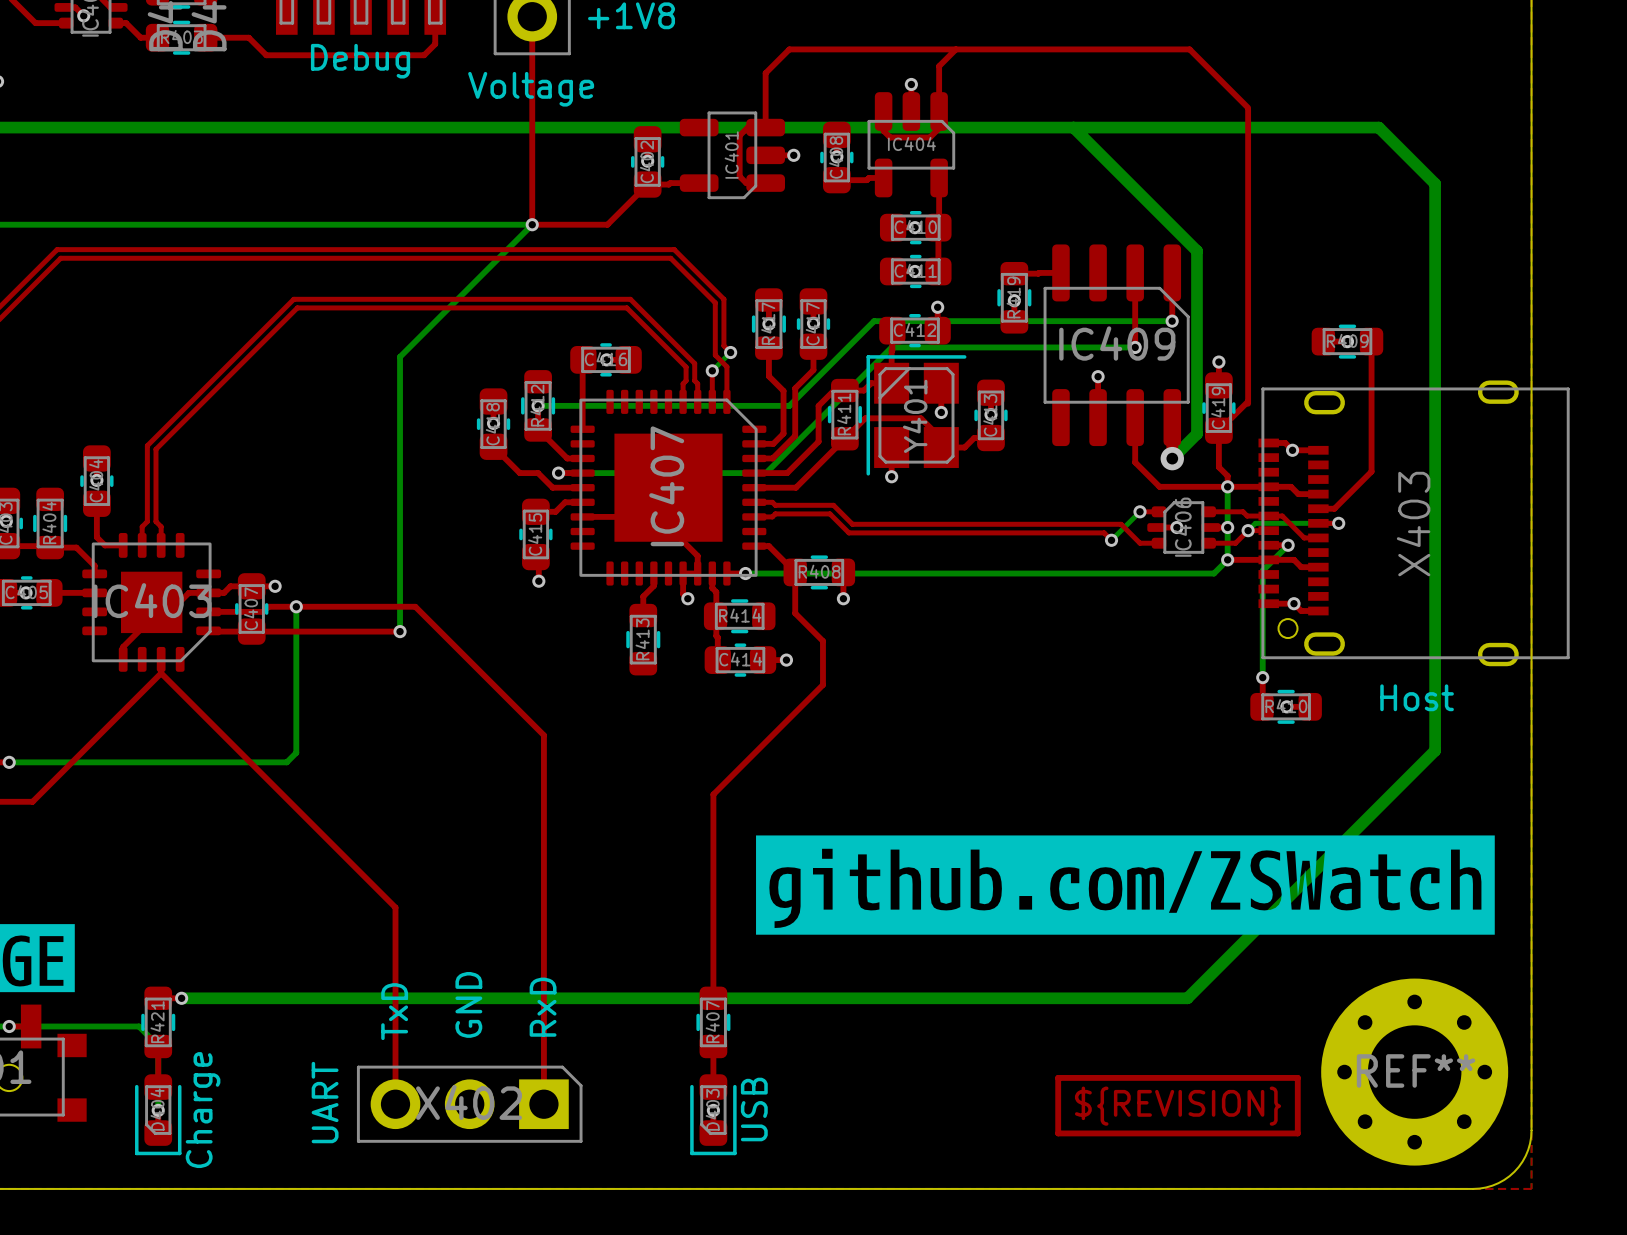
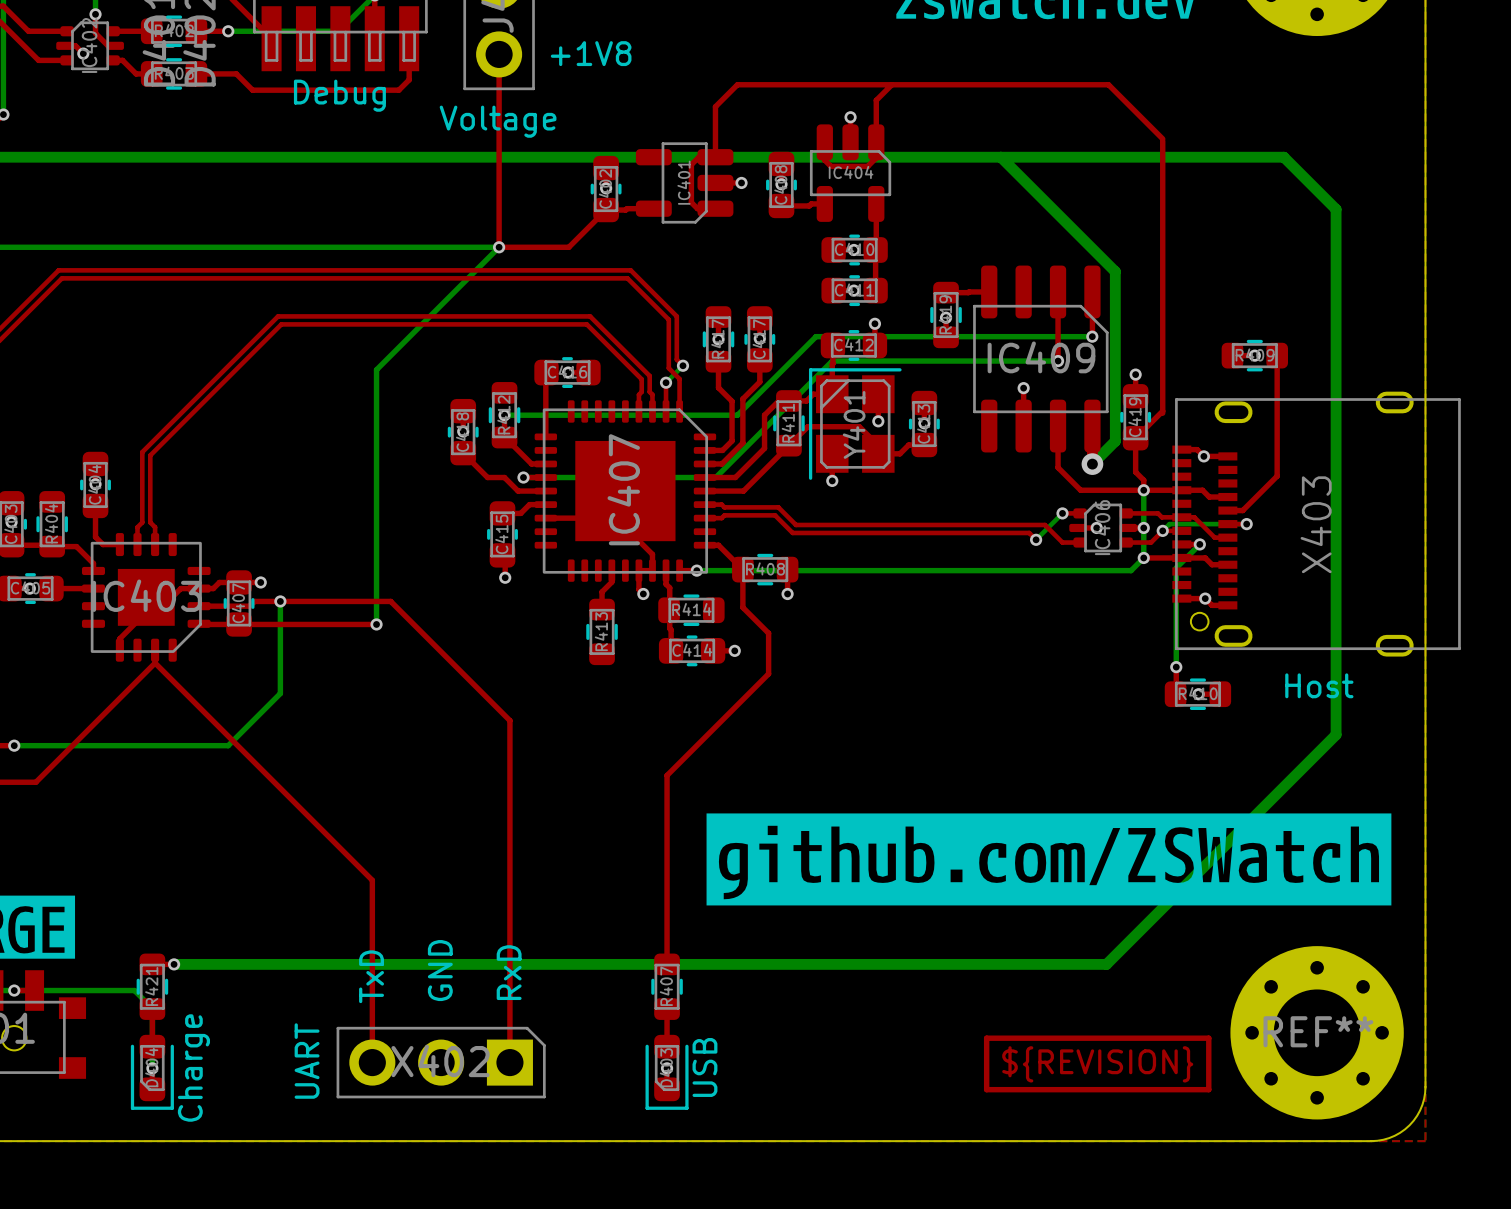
bottom track: (296, 706) (296, 752) (286, 762) (240, 762) -> (280, 693) (228, 745)

